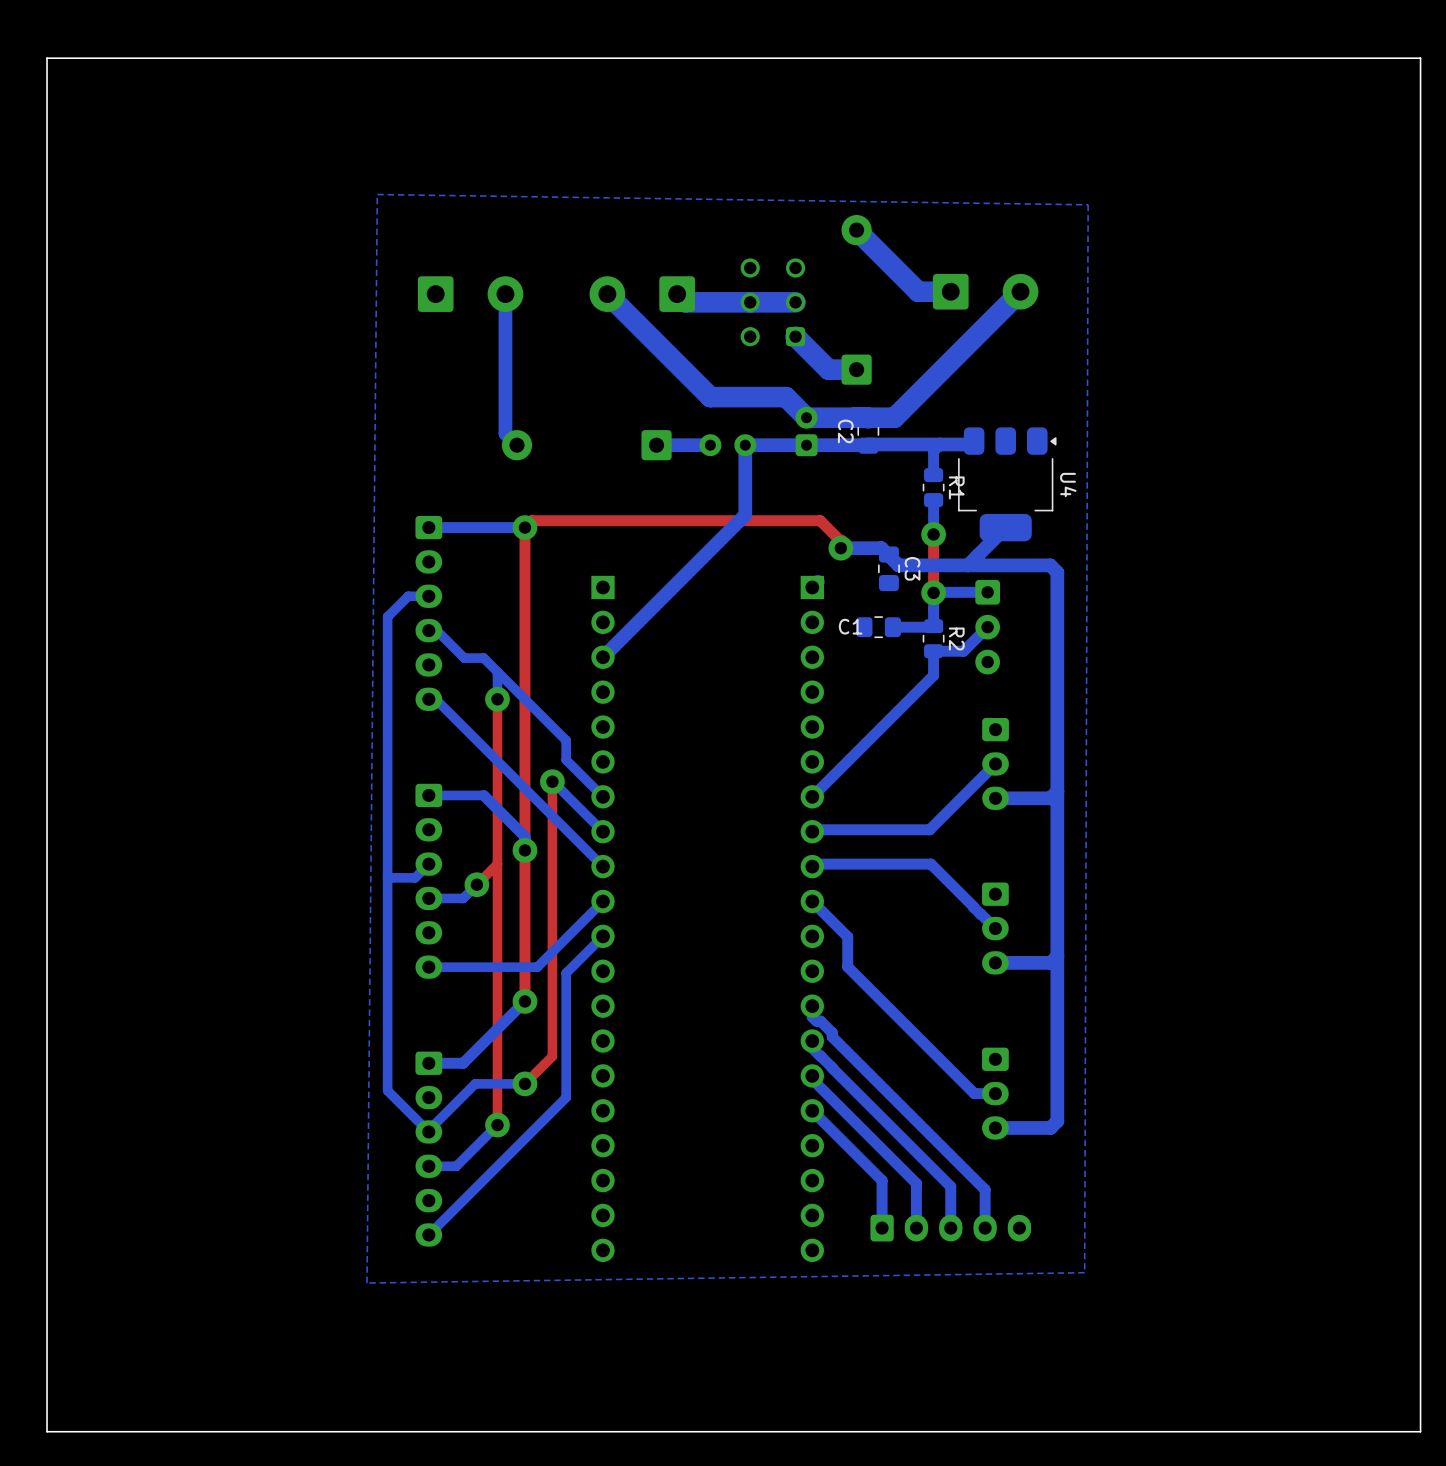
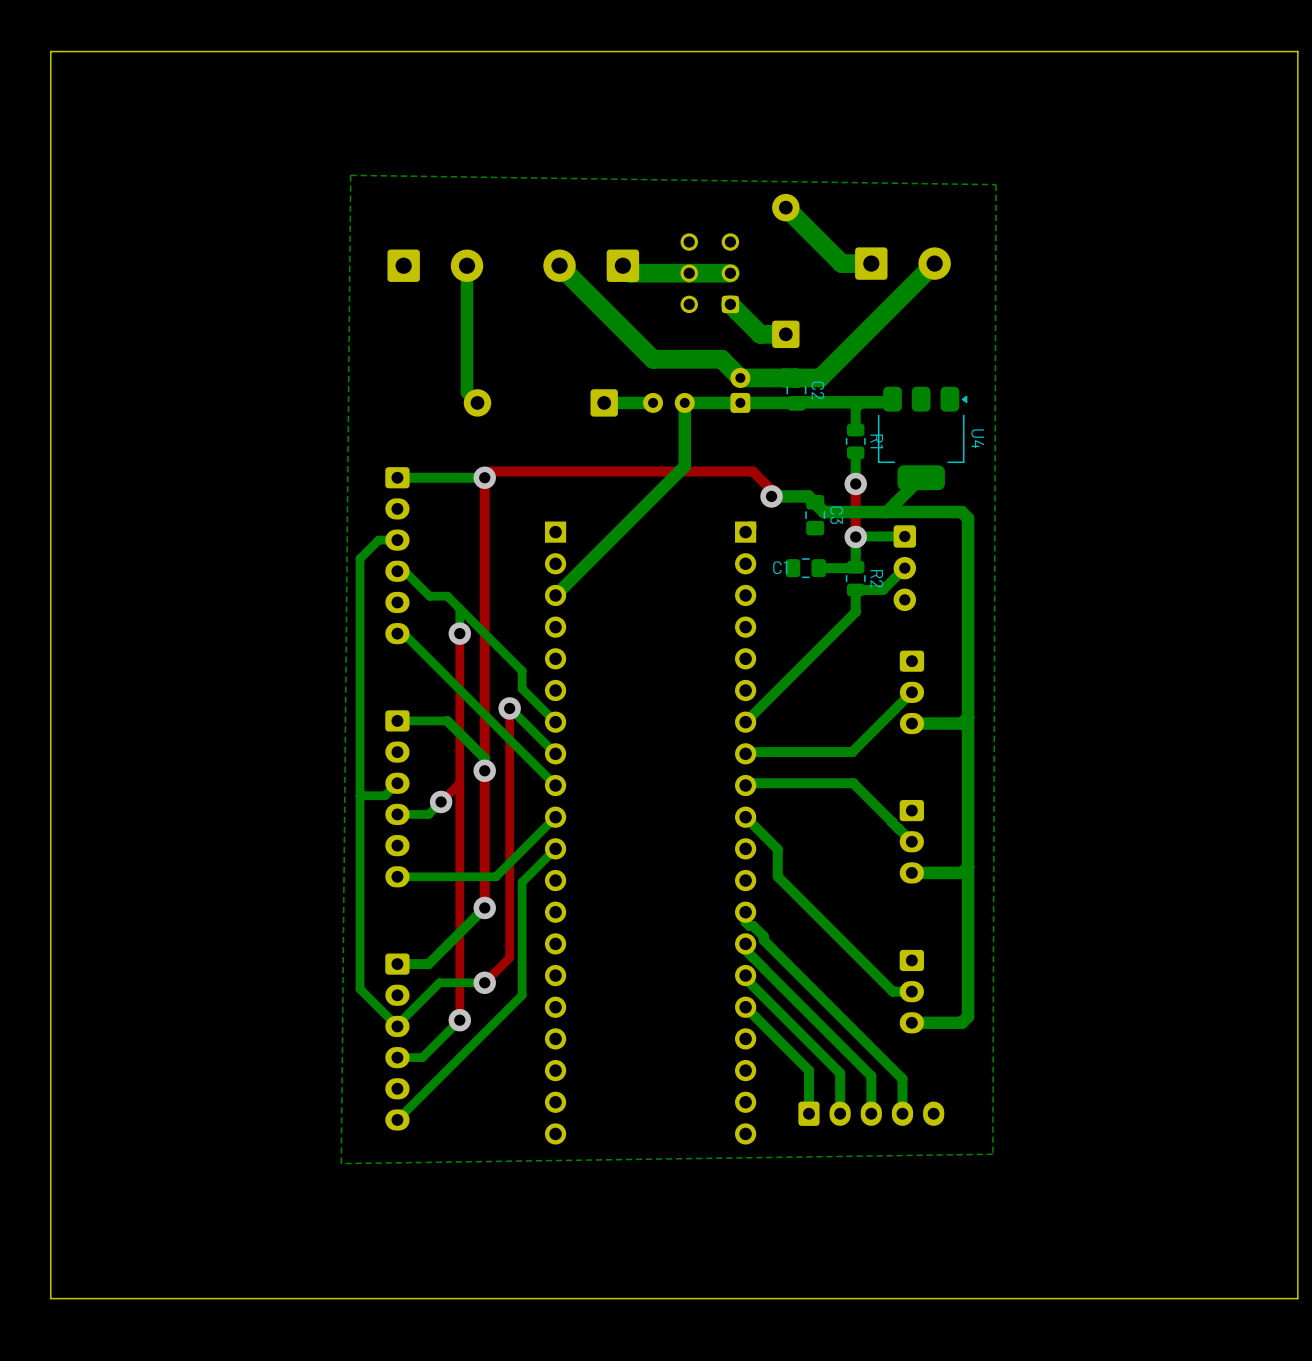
C2 name position: C2 (845, 431) -> C2 (817, 390)

